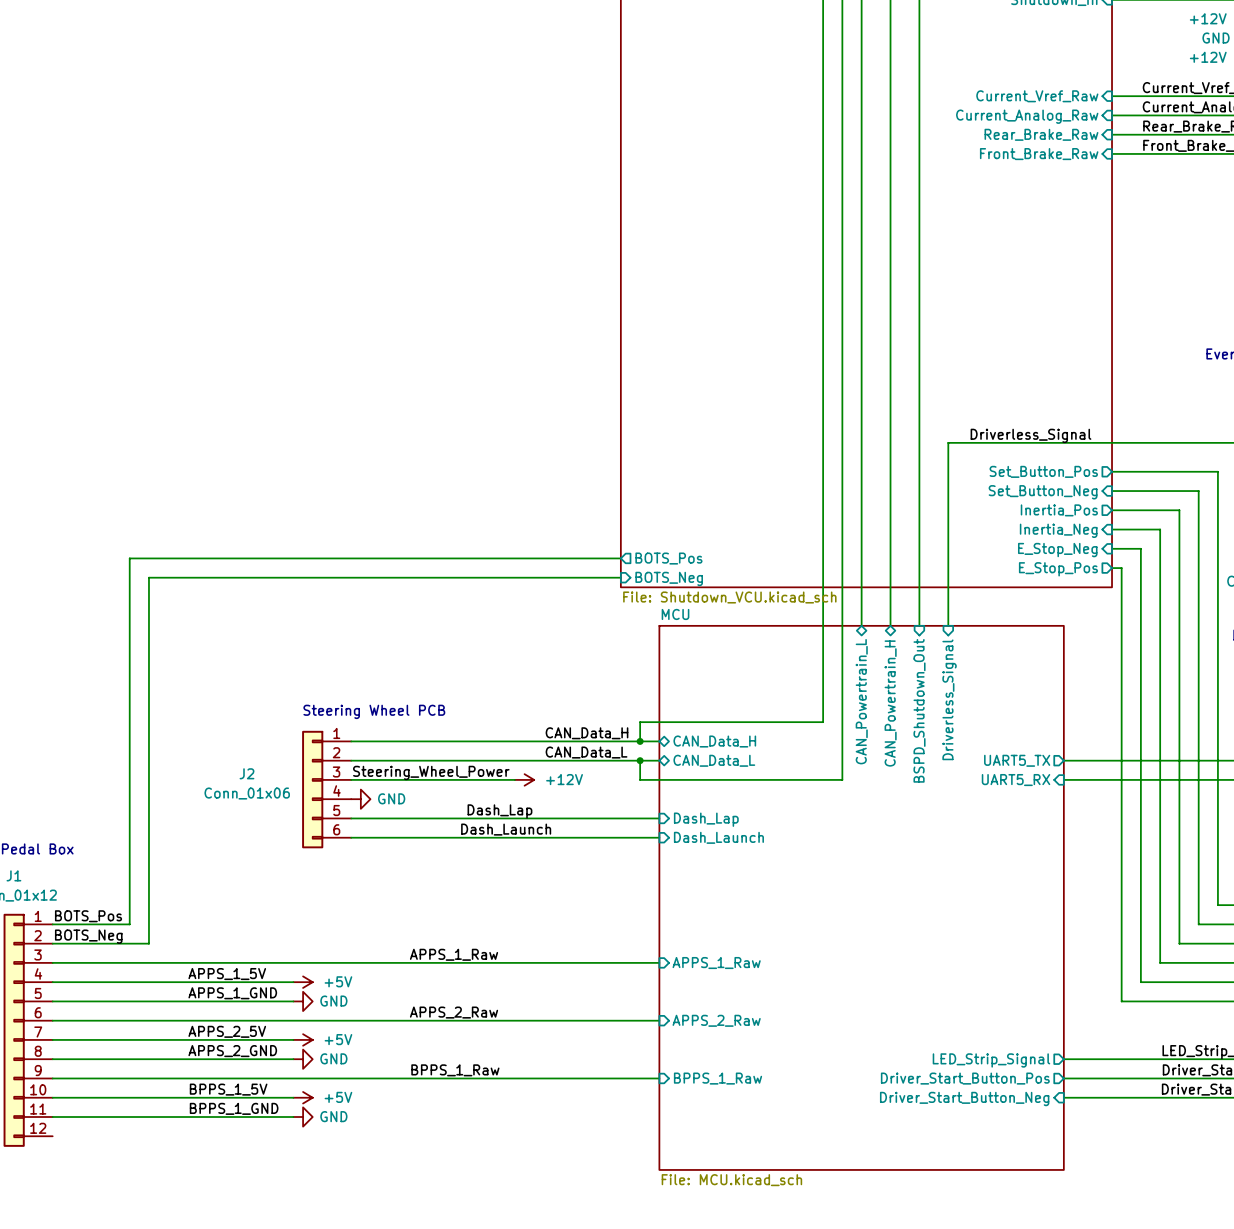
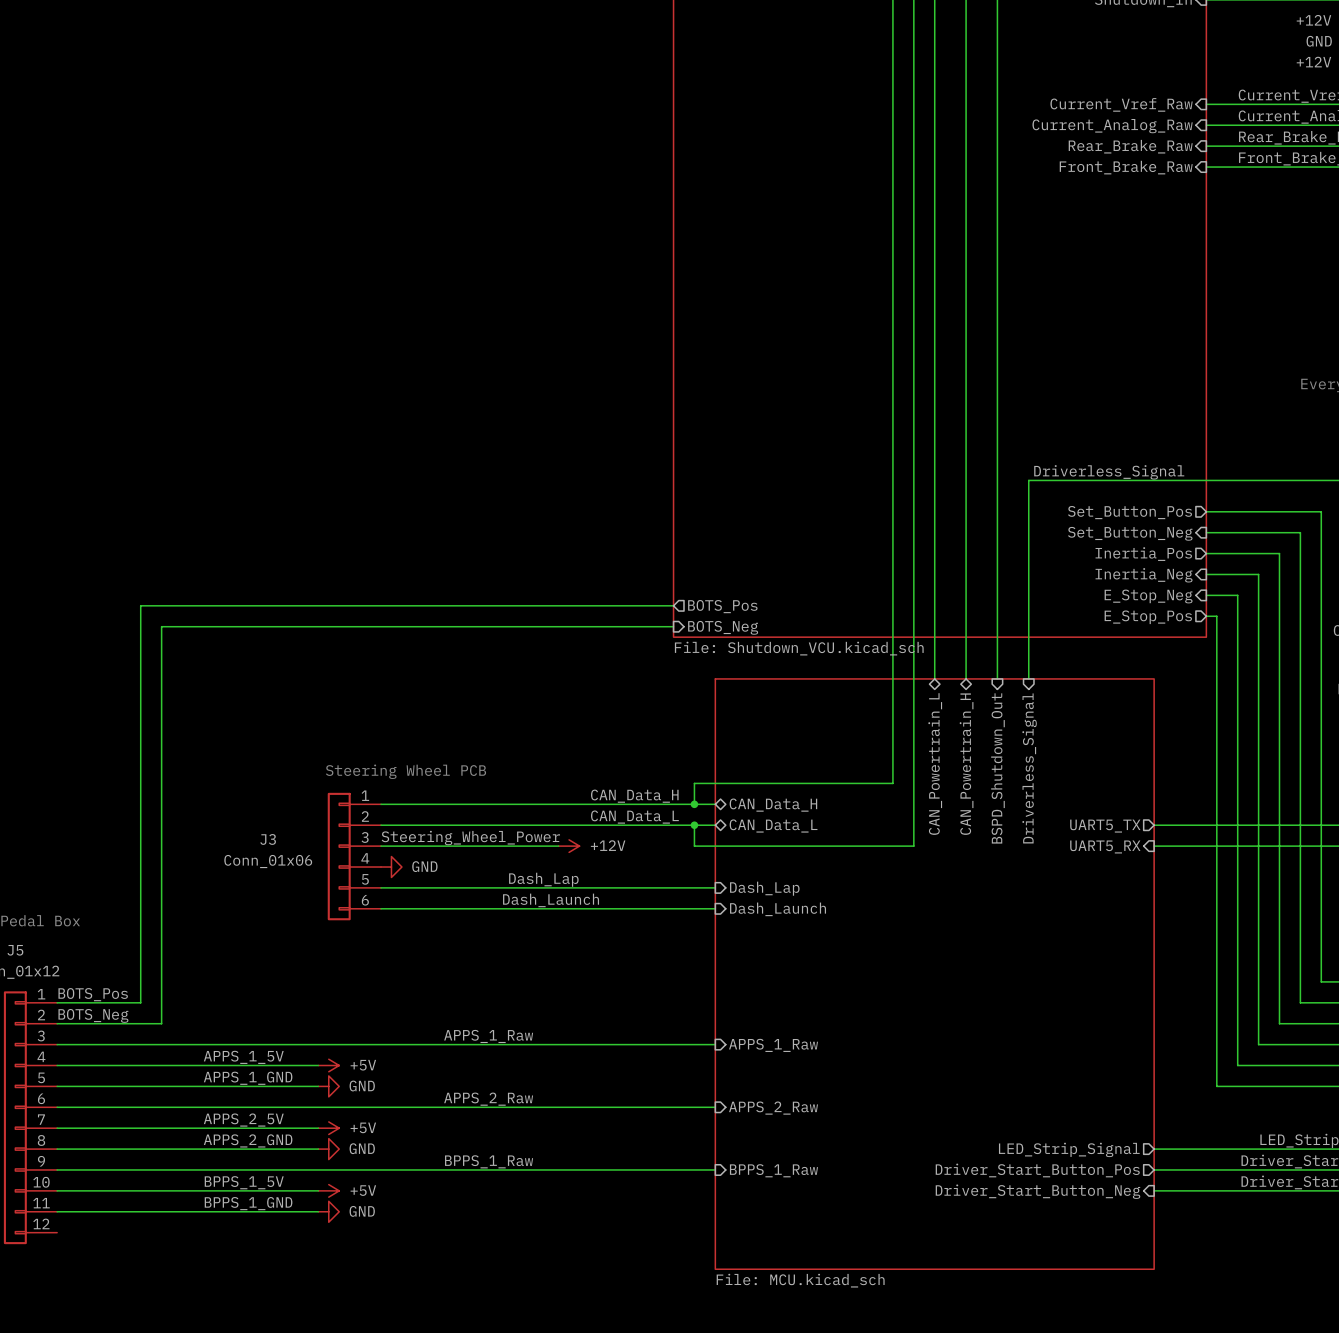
sheet MCU name: MCU (675, 614) -> none
J2 name: J2 (246, 773) -> J3 (268, 839)
J1 name: J1 (13, 875) -> J5 (15, 950)

